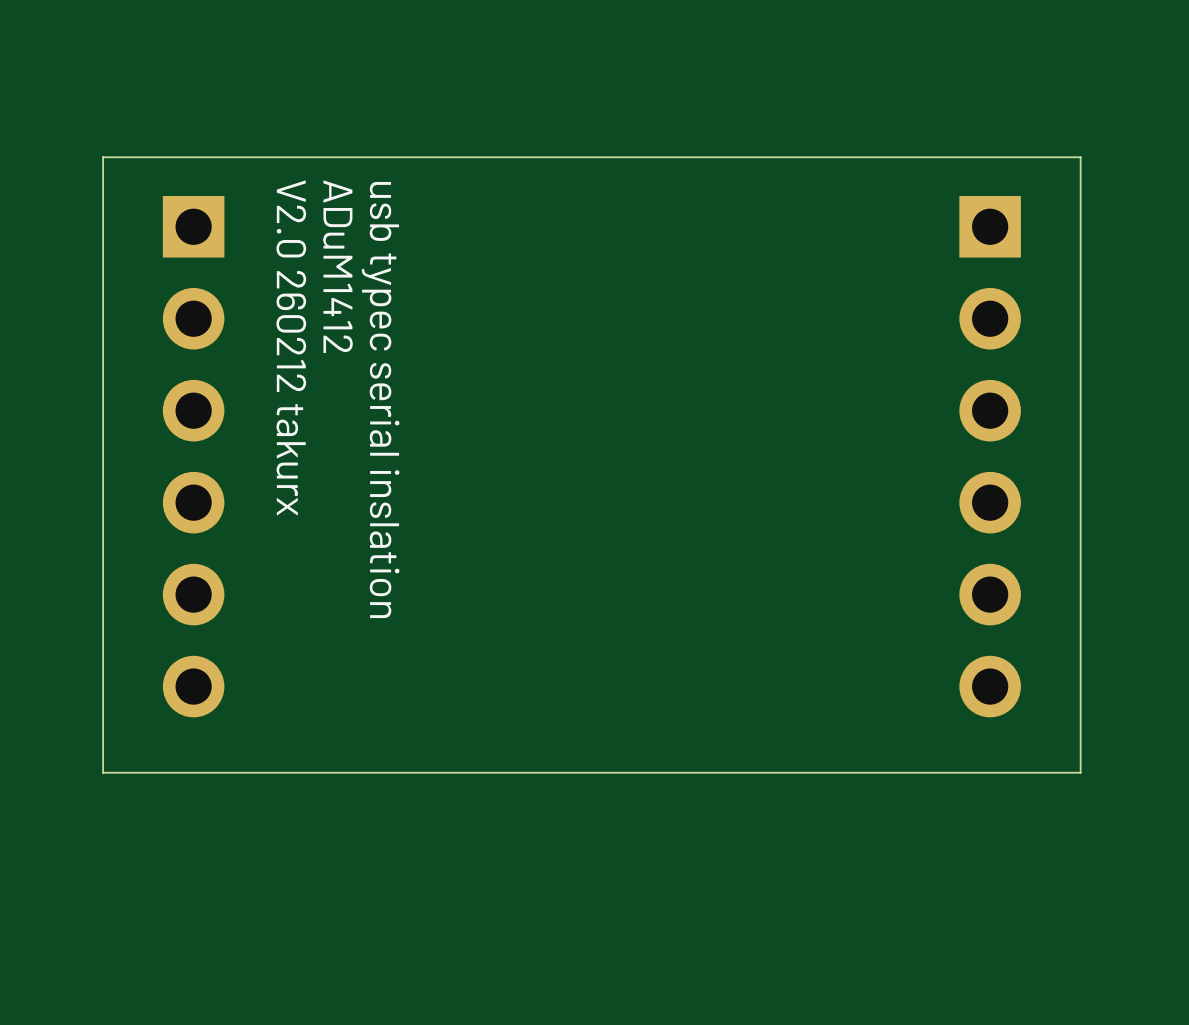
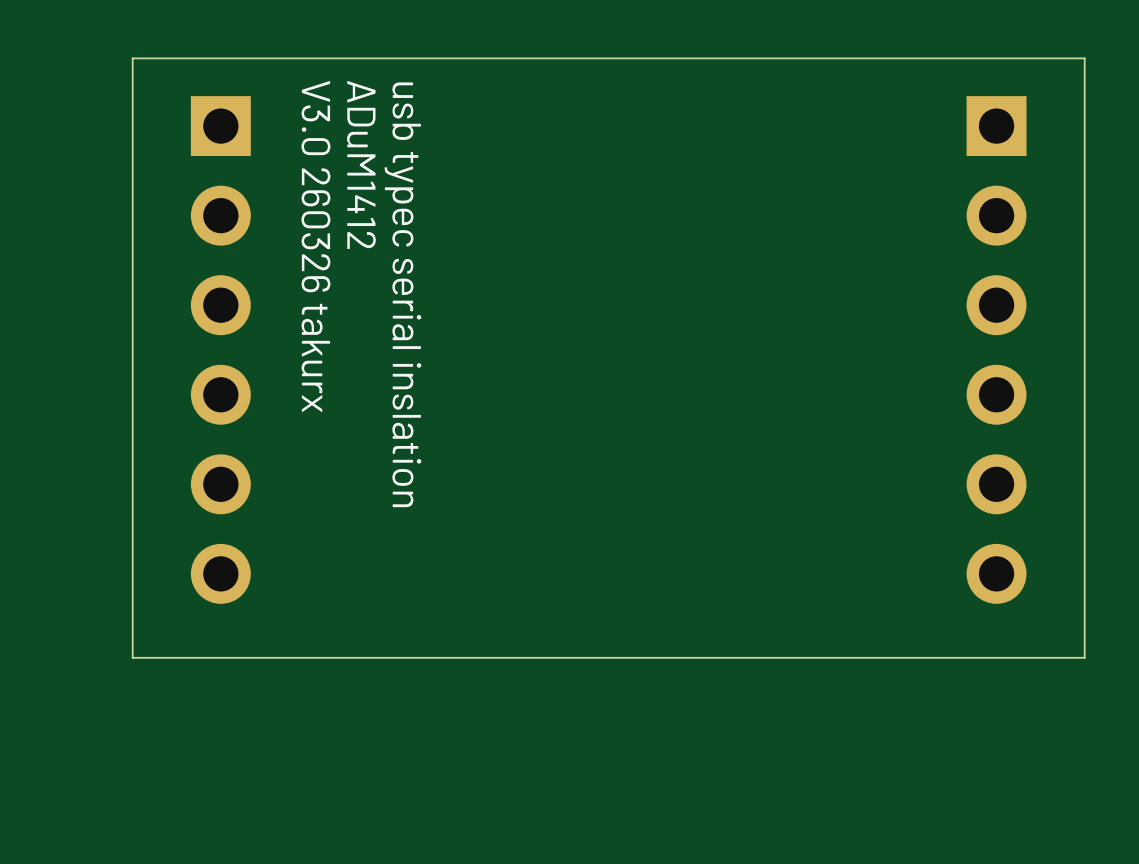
text: V2.0 260212 takurx (291, 347) -> V3.0 260326 takurx (315, 246)

